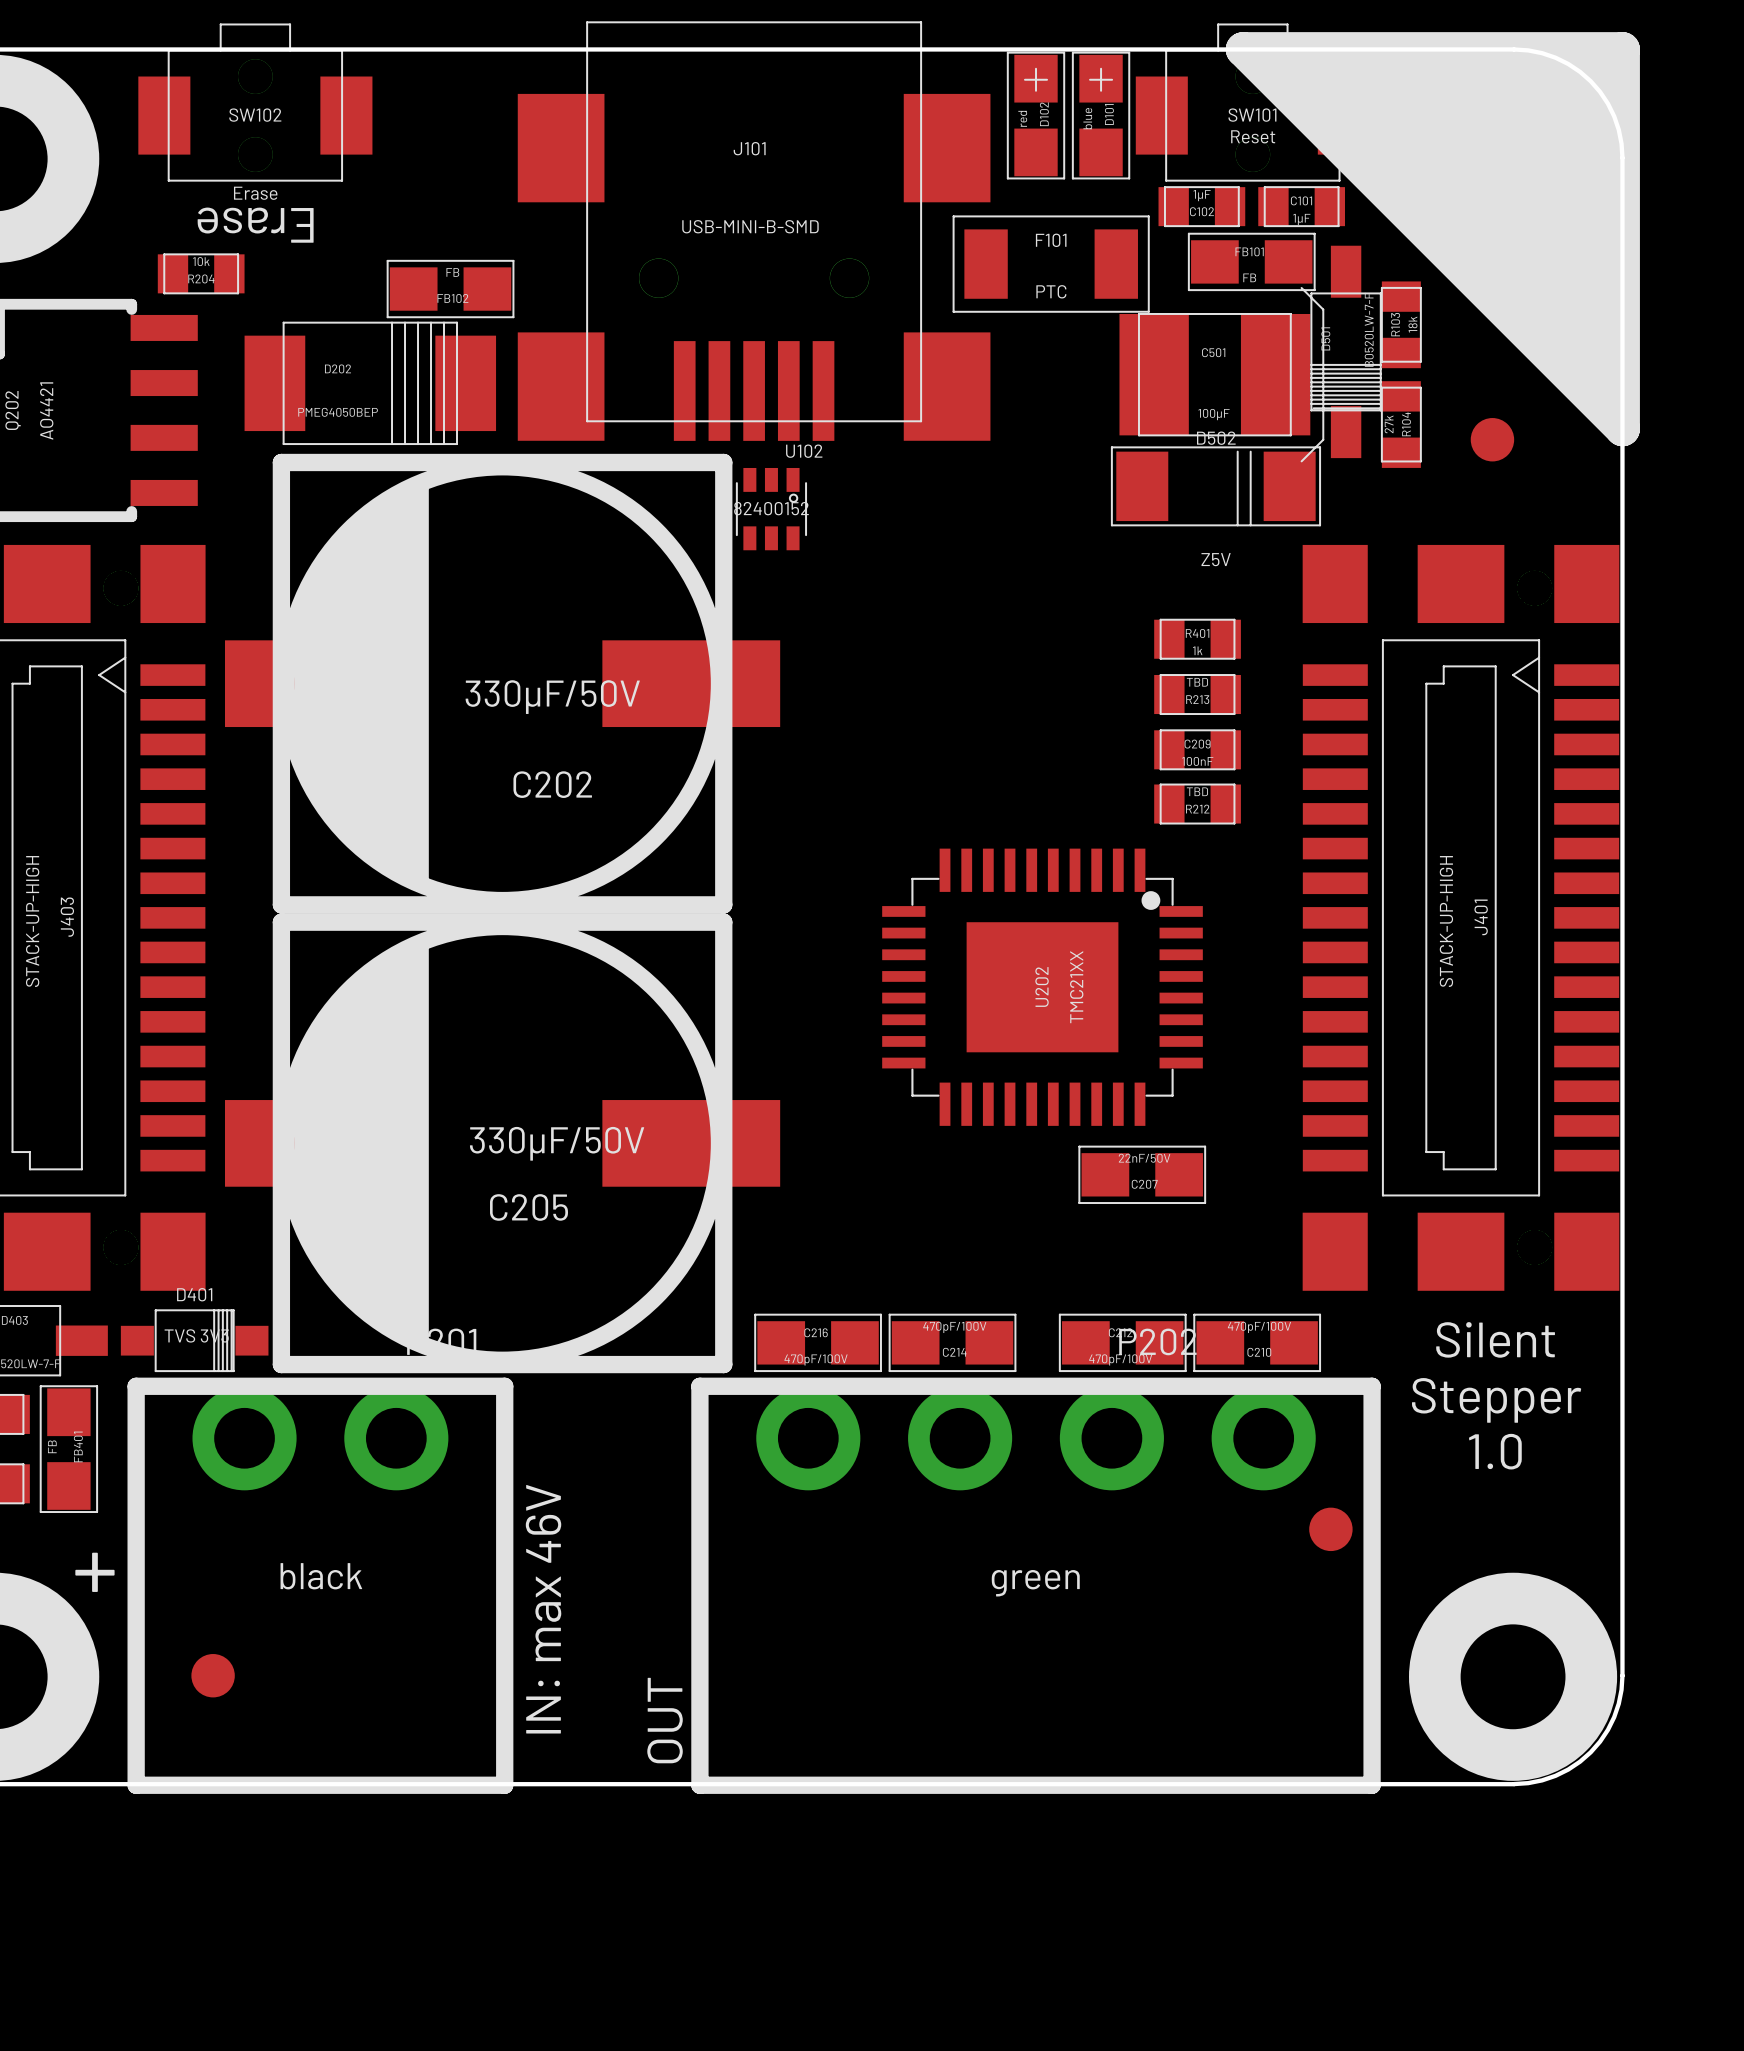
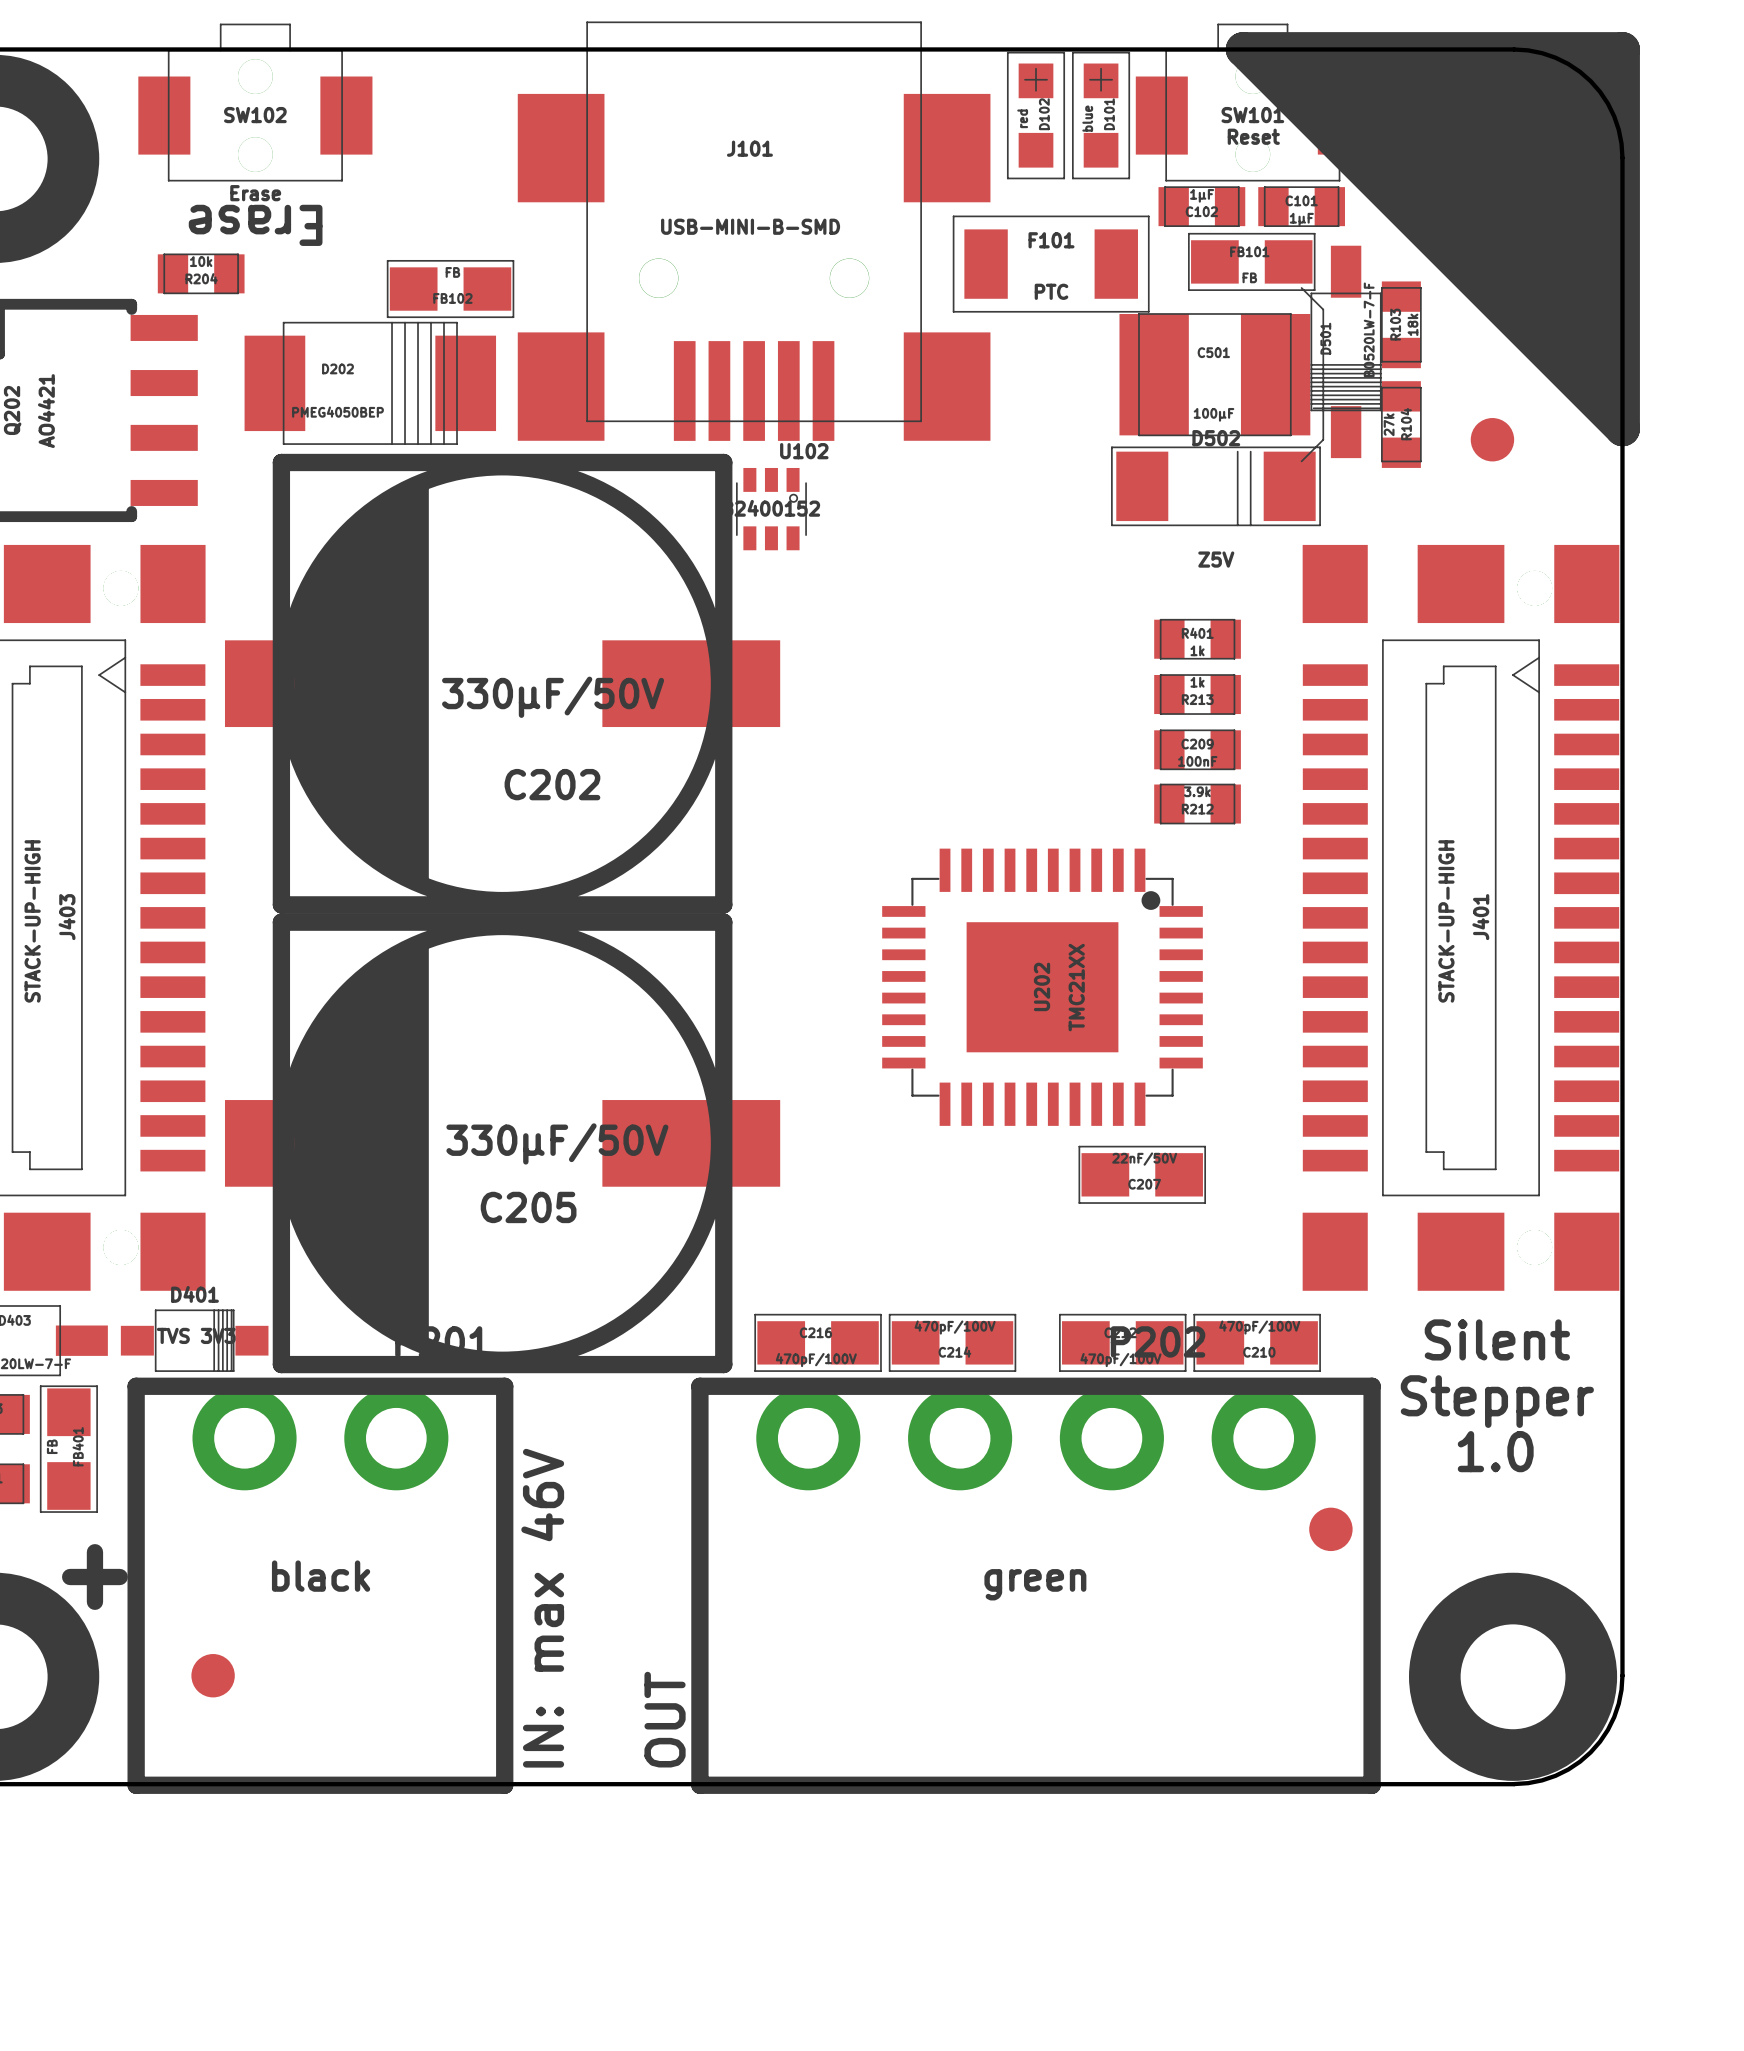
D102 footprint: [1007, 52, 1065, 179] -> [1007, 52, 1065, 179]
D101 footprint: [1072, 52, 1130, 179] -> [1072, 52, 1130, 179]
R213 value: TBD (1197, 682) -> 1k (1197, 682)
R212 value: TBD (1197, 791) -> 3.9k (1197, 791)

